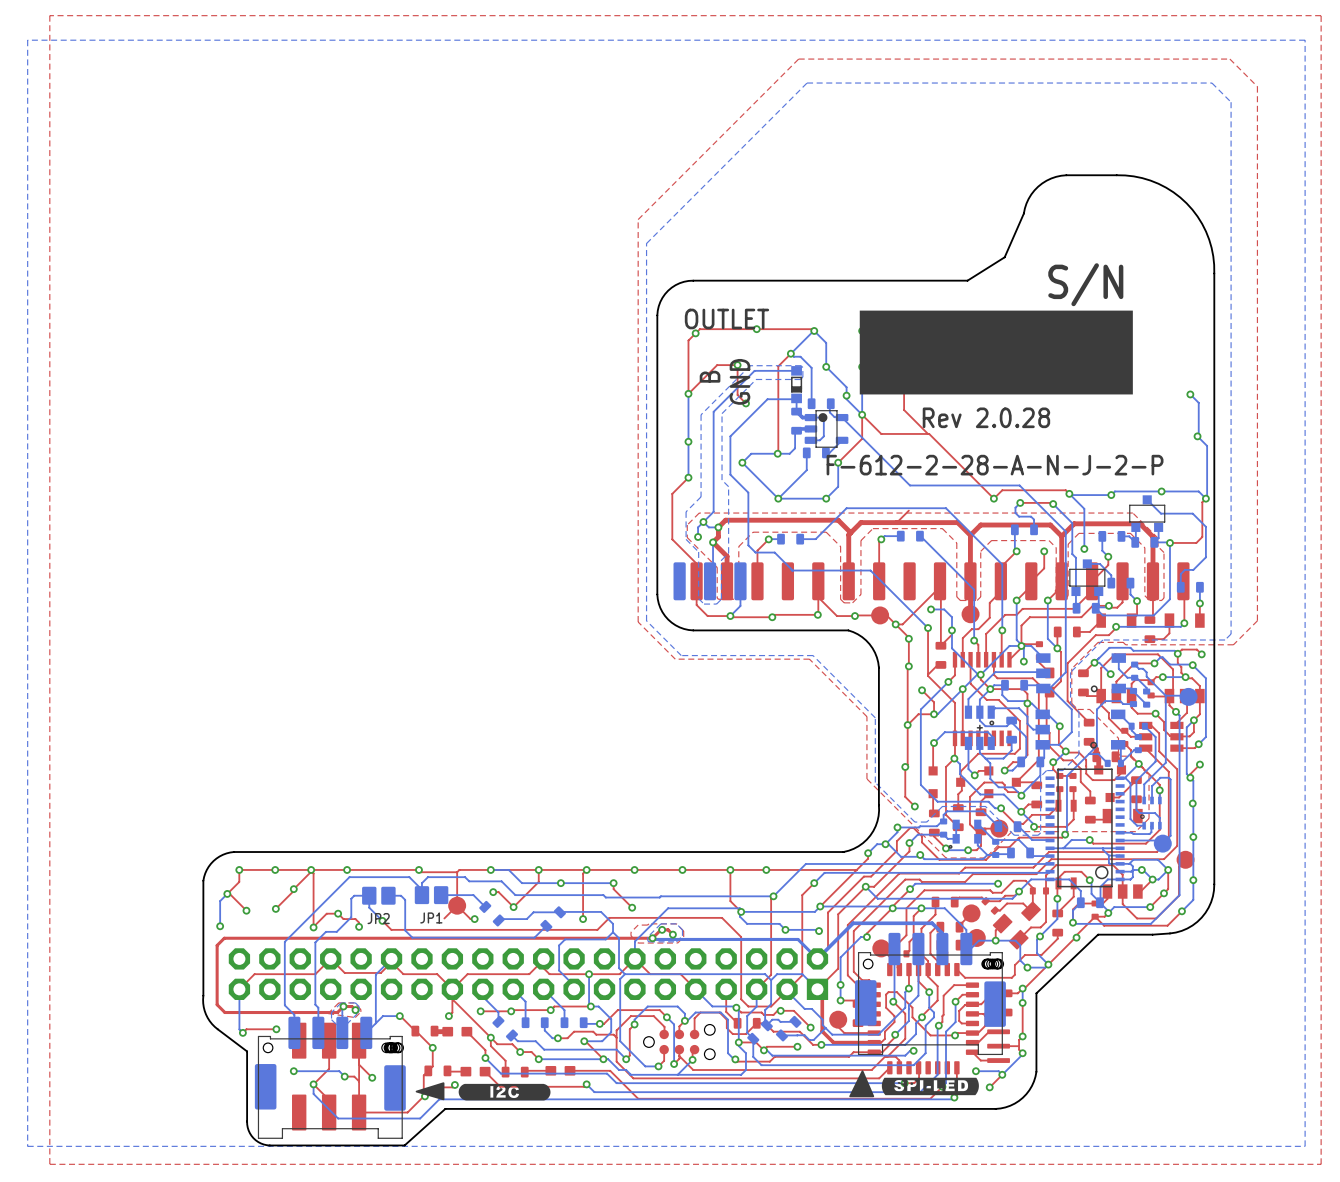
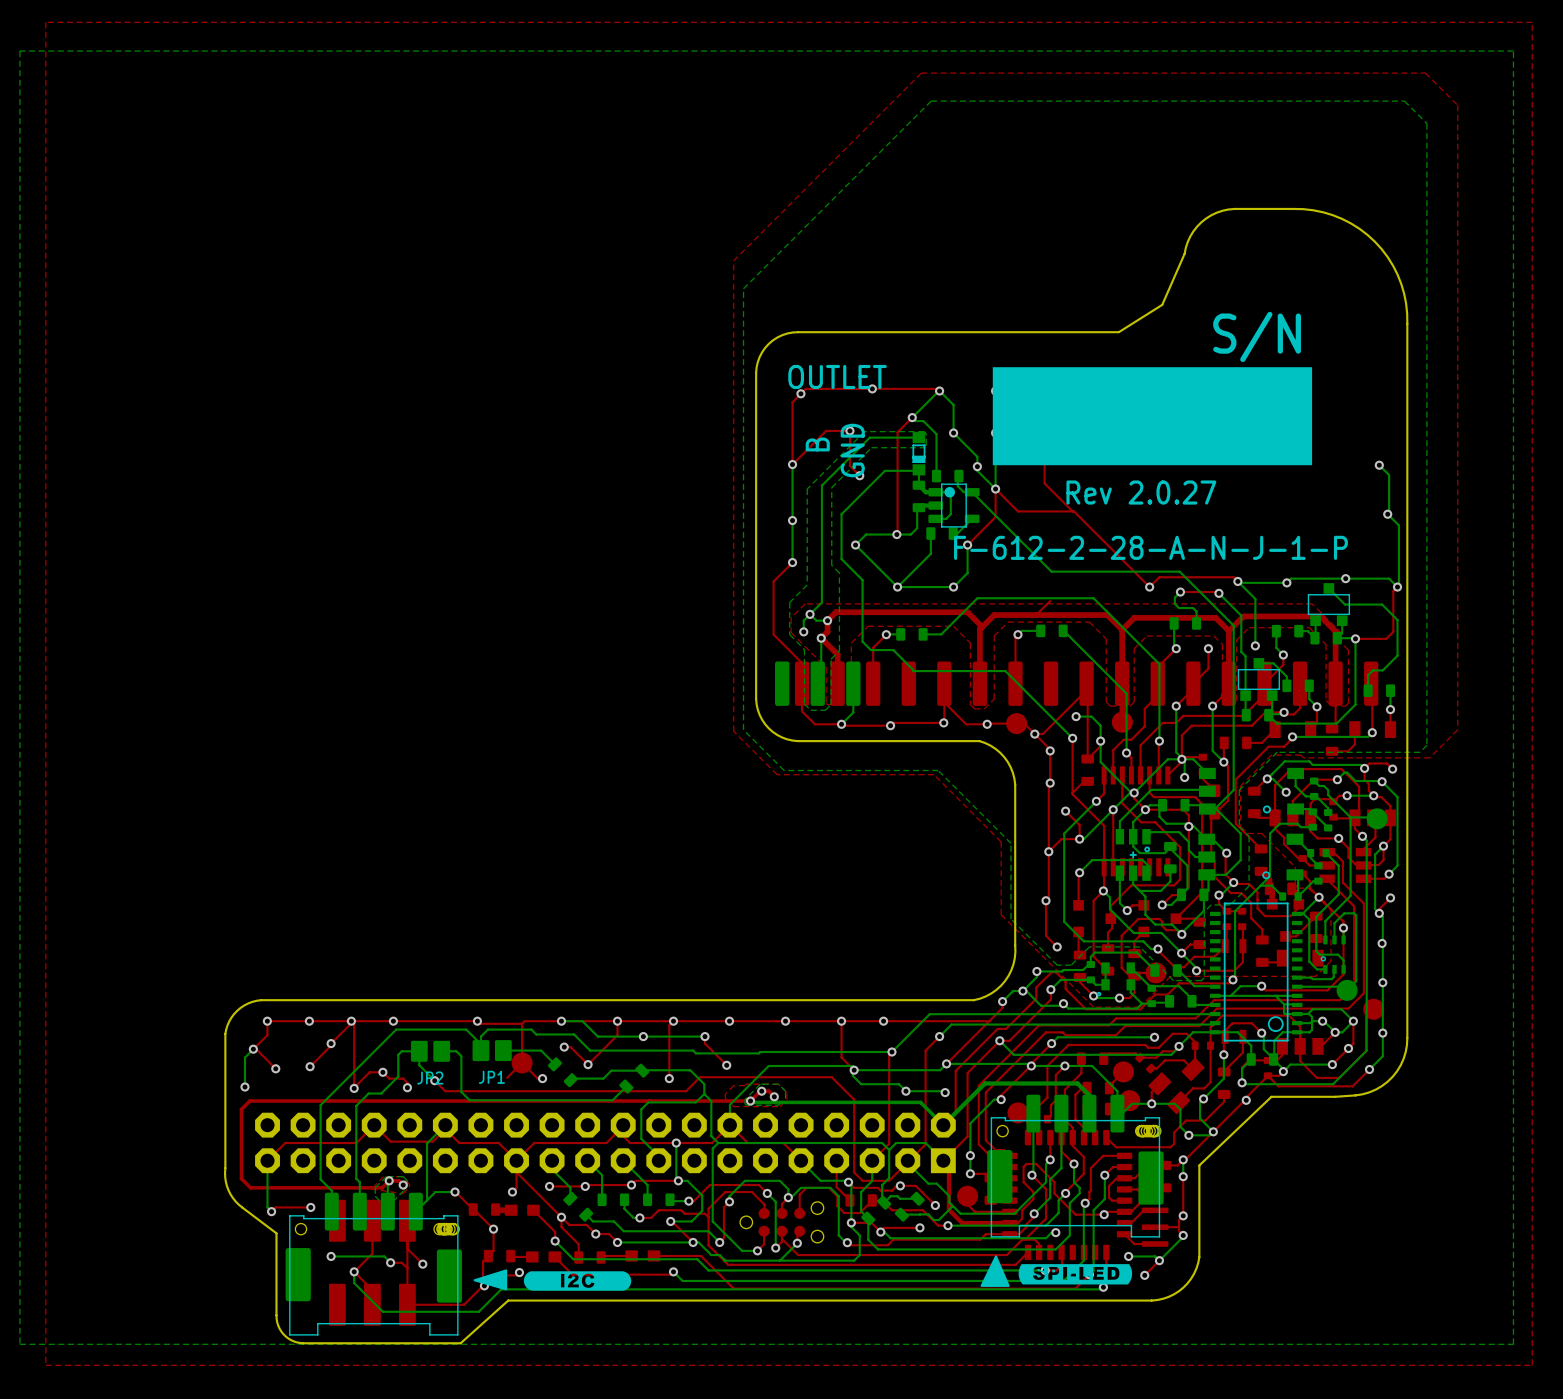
text: Rev 2.0.28 (986, 417) -> Rev 2.0.27 (1141, 492)
text: F-612-2-28-A-N-J-2-P (995, 465) -> F-612-2-28-A-N-J-1-P (1150, 547)

